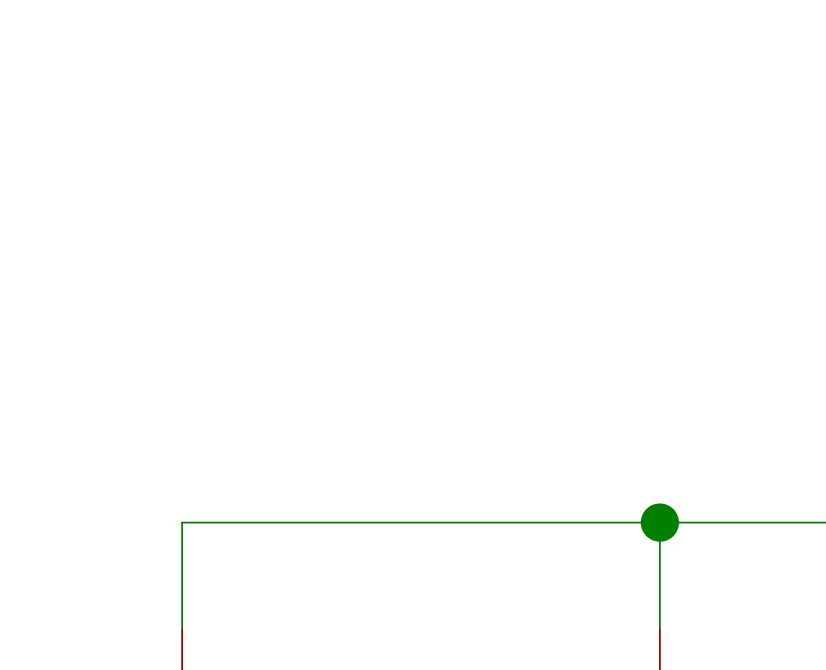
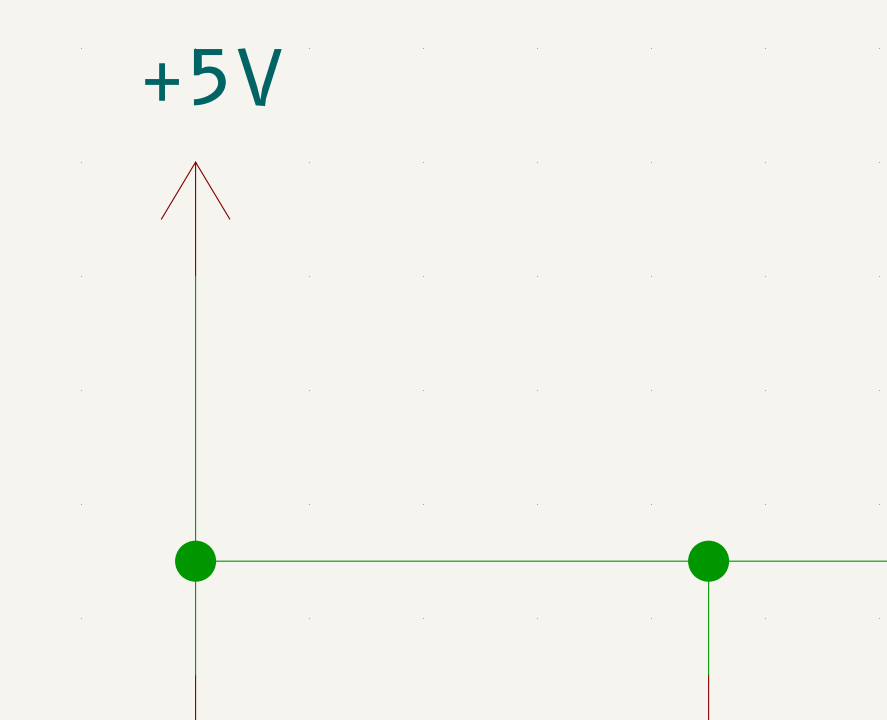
power symbol: none -> +5V (195, 219)
wire: none -> (195, 276) (195, 561)
junction: none -> (195, 561)

